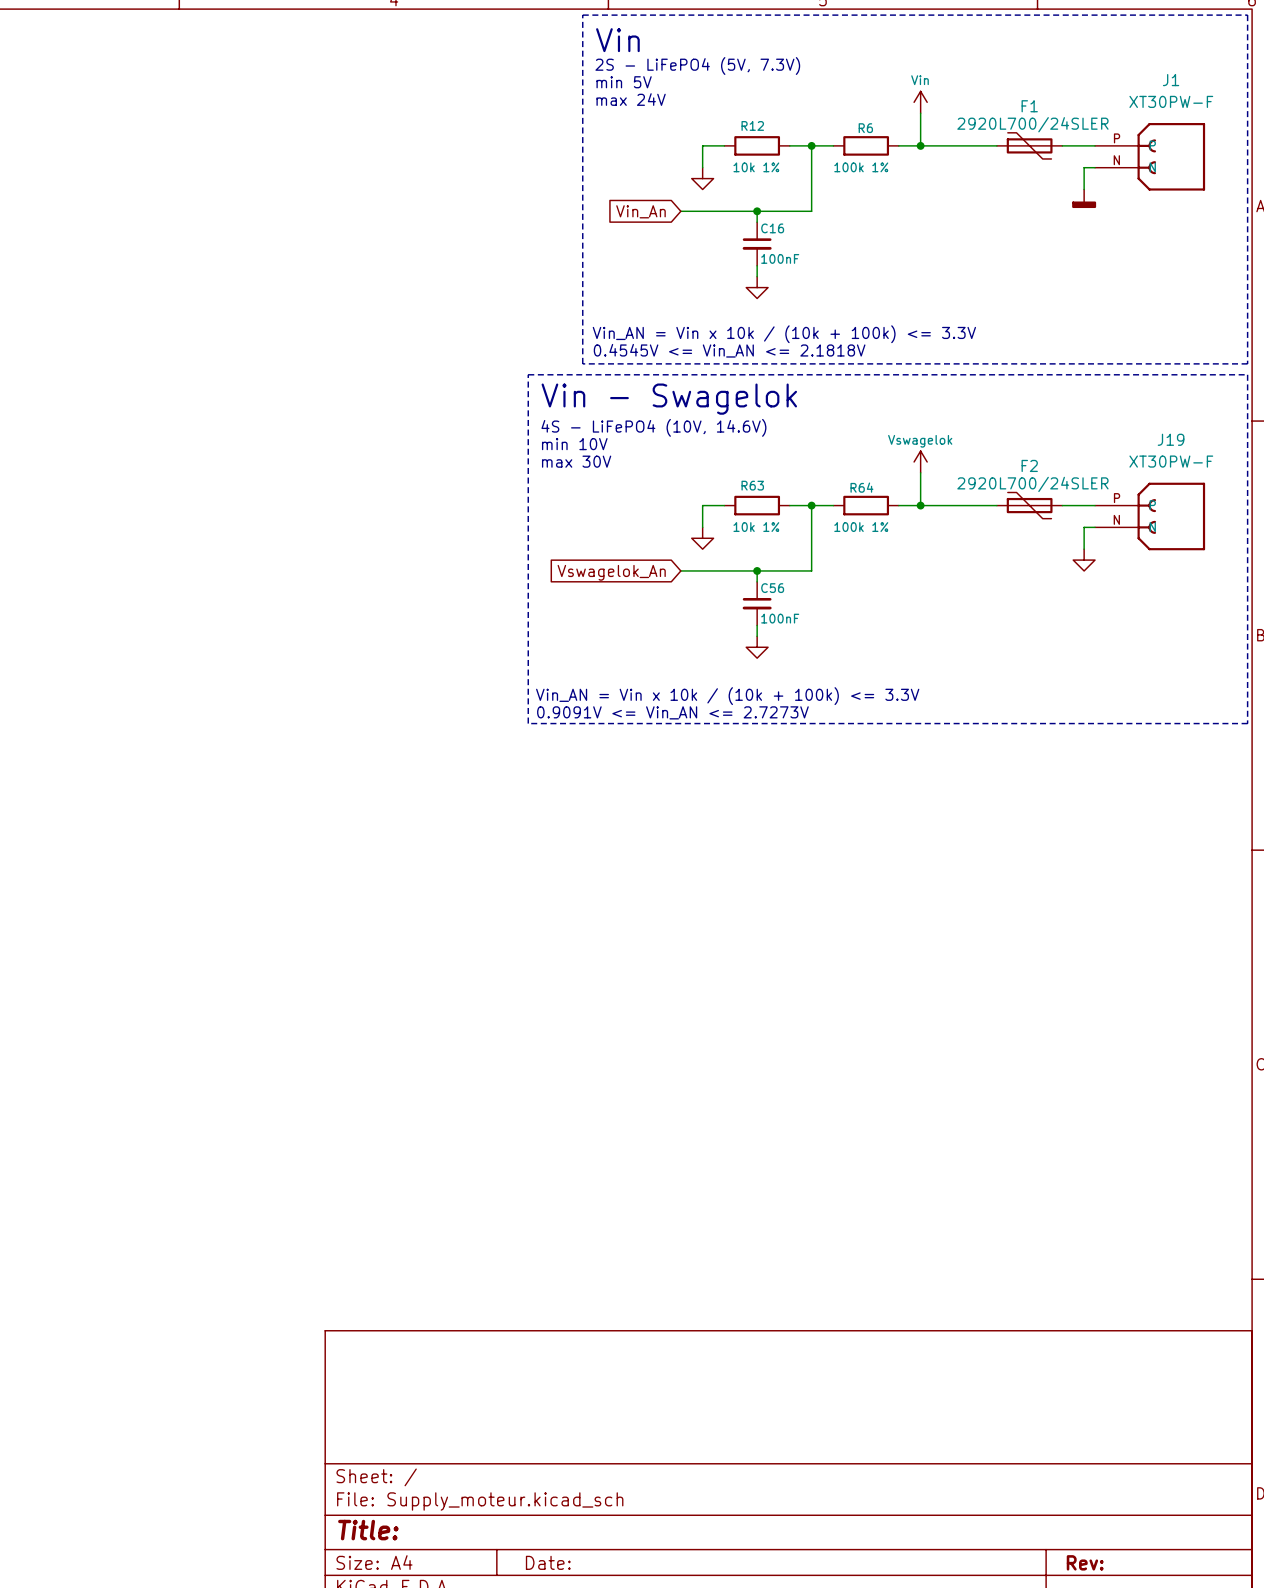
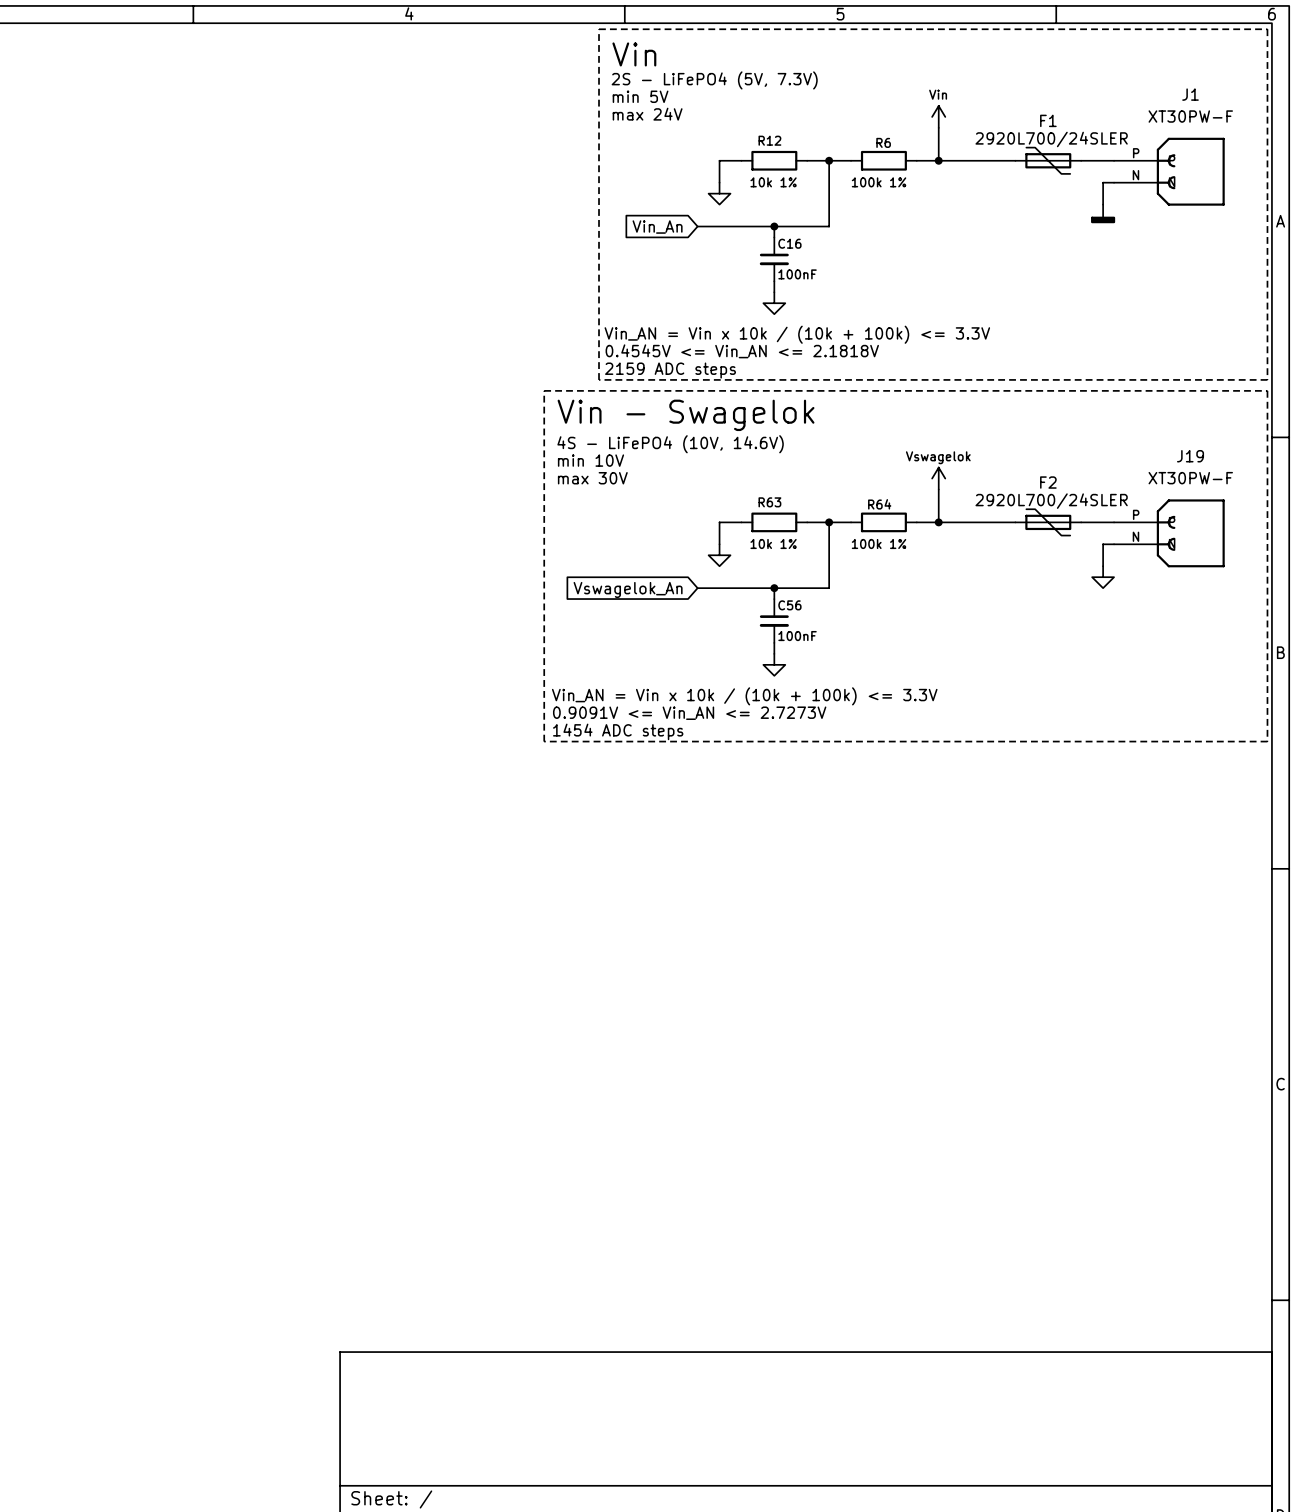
text: none -> Vin_AN = Vin x 10k / (10k + 100k) <= 3.3V (797, 334)
text: Vin_AN = Vin x 10k / (10k + 100k) <= 3.3V (784, 334) -> 0.4545V <= Vin_AN <= 2.1818V (742, 351)
text: 0.4545V <= Vin_AN <= 2.1818V (729, 350) -> 2159 ADC steps (670, 370)
text: none -> Vin_AN = Vin x 10k / (10k + 100k) <= 3.3V (744, 696)
text: Vin_AN = Vin x 10k / (10k + 100k) <= 3.3V (727, 696) -> 0.9091V <= Vin_AN <= 2.7273V (689, 713)
text: 0.9091V <= Vin_AN <= 2.7273V (672, 712) -> 1454 ADC steps (618, 731)

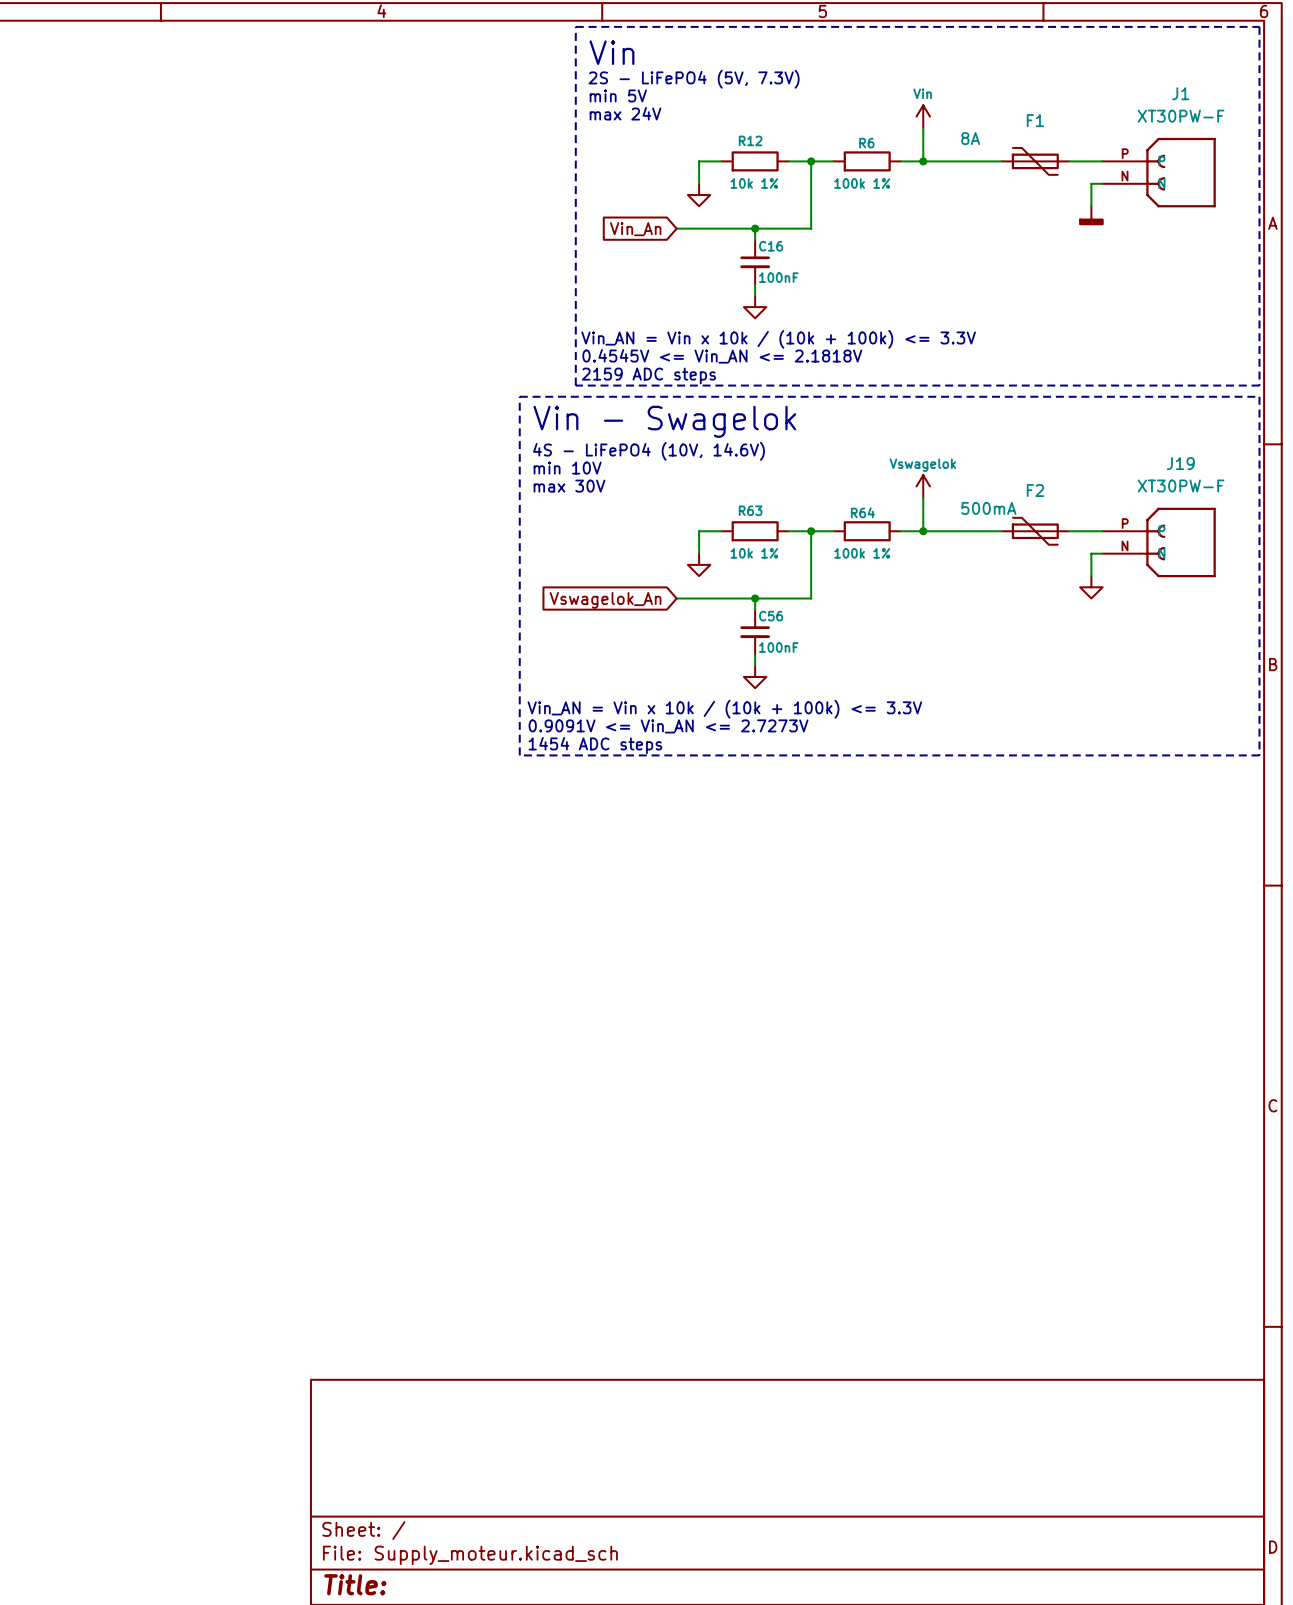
F1 value: 2920L700/24SLER (1051, 139) -> 8A (970, 138)
F2 value: 2920L700/24SLER (1051, 501) -> 500mA (988, 508)

